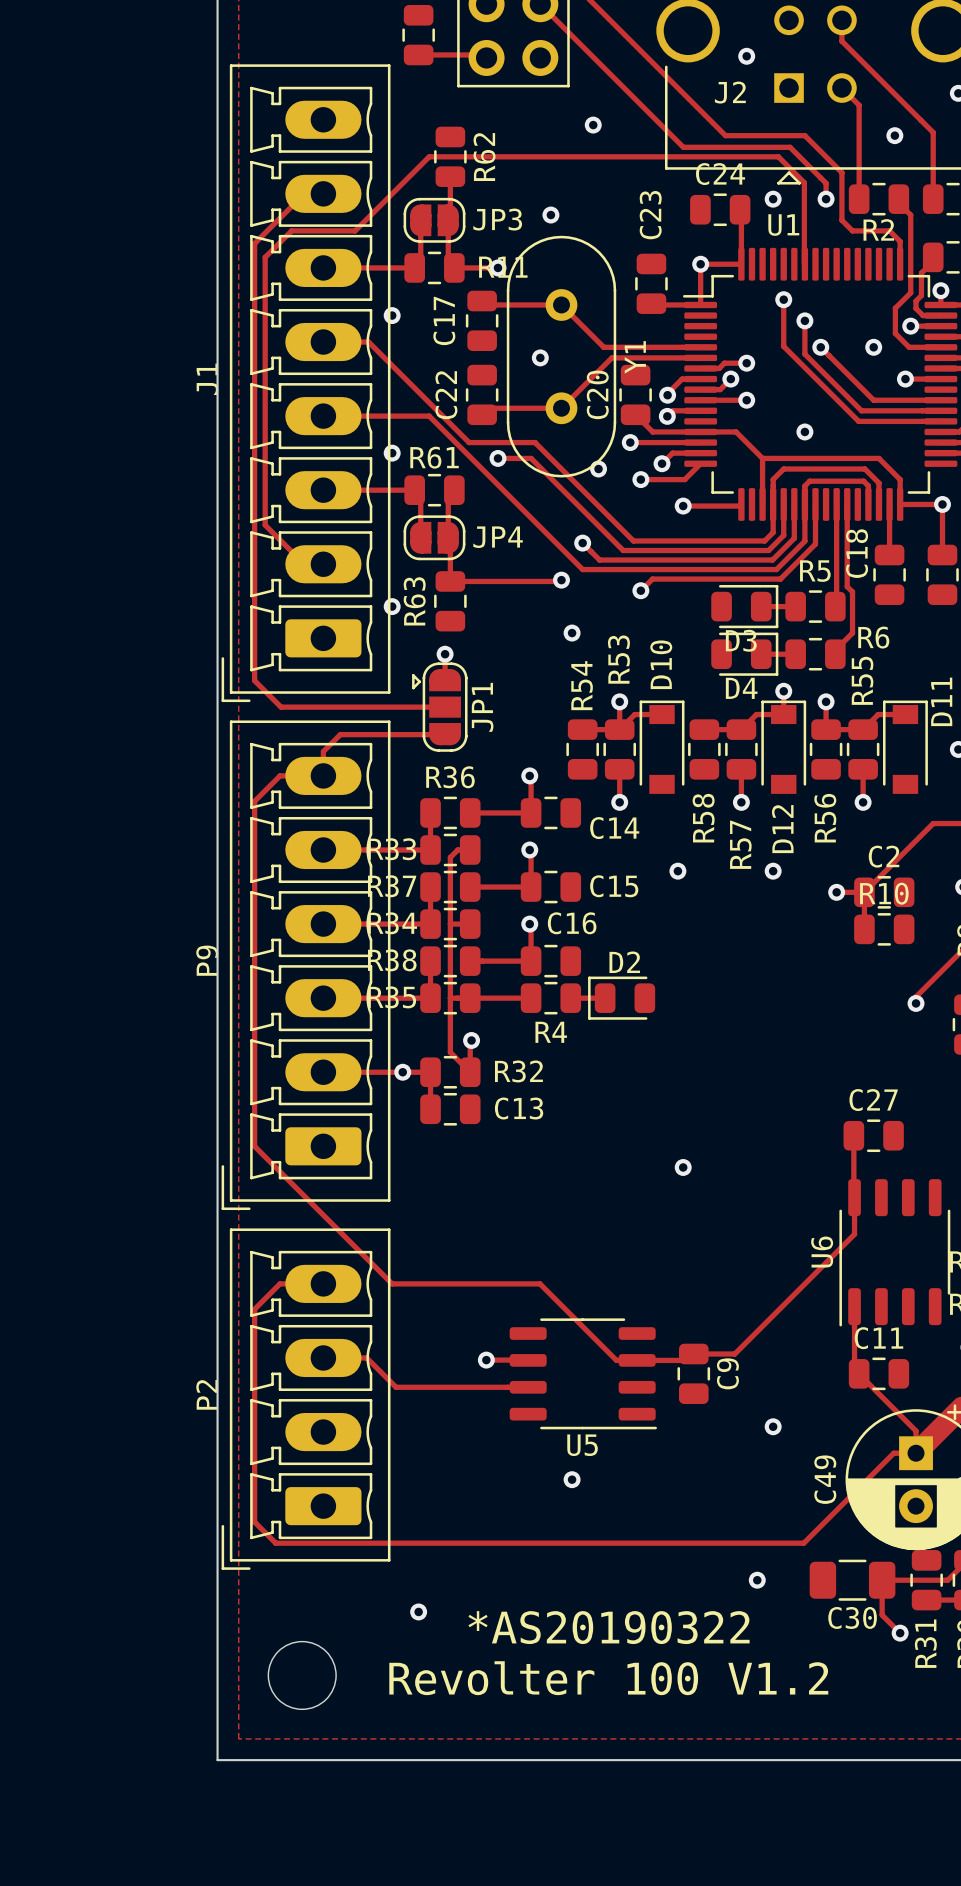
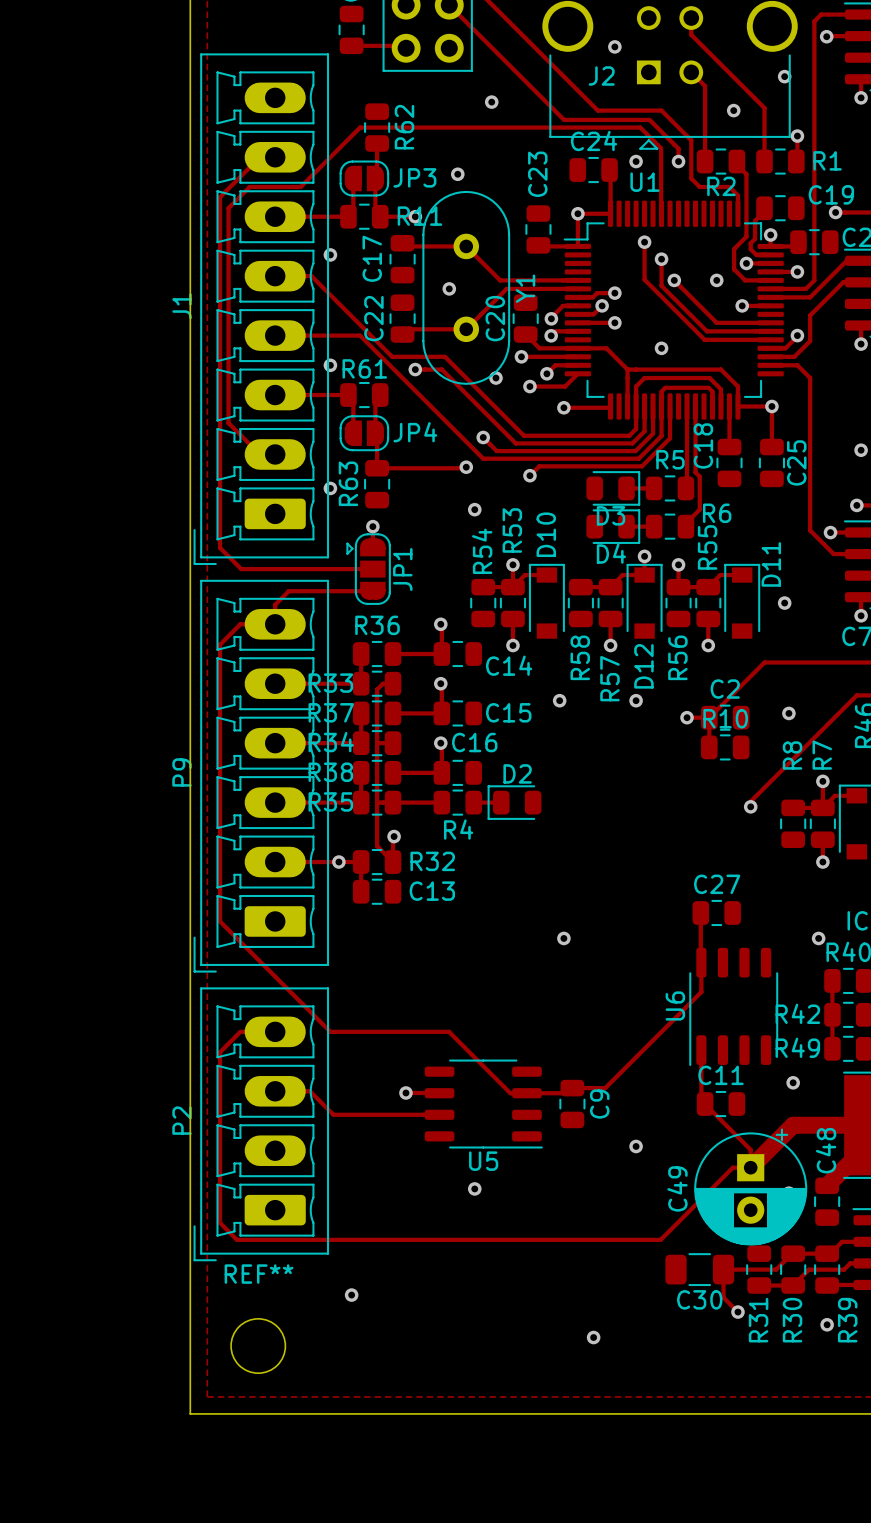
via position: (757, 1580) -> (593, 1337)
REF** name: none -> REF** (259, 1274)
text: *AS20190322 (609, 1627) -> none
text: Revolter 100 V1.2 (608, 1678) -> none

